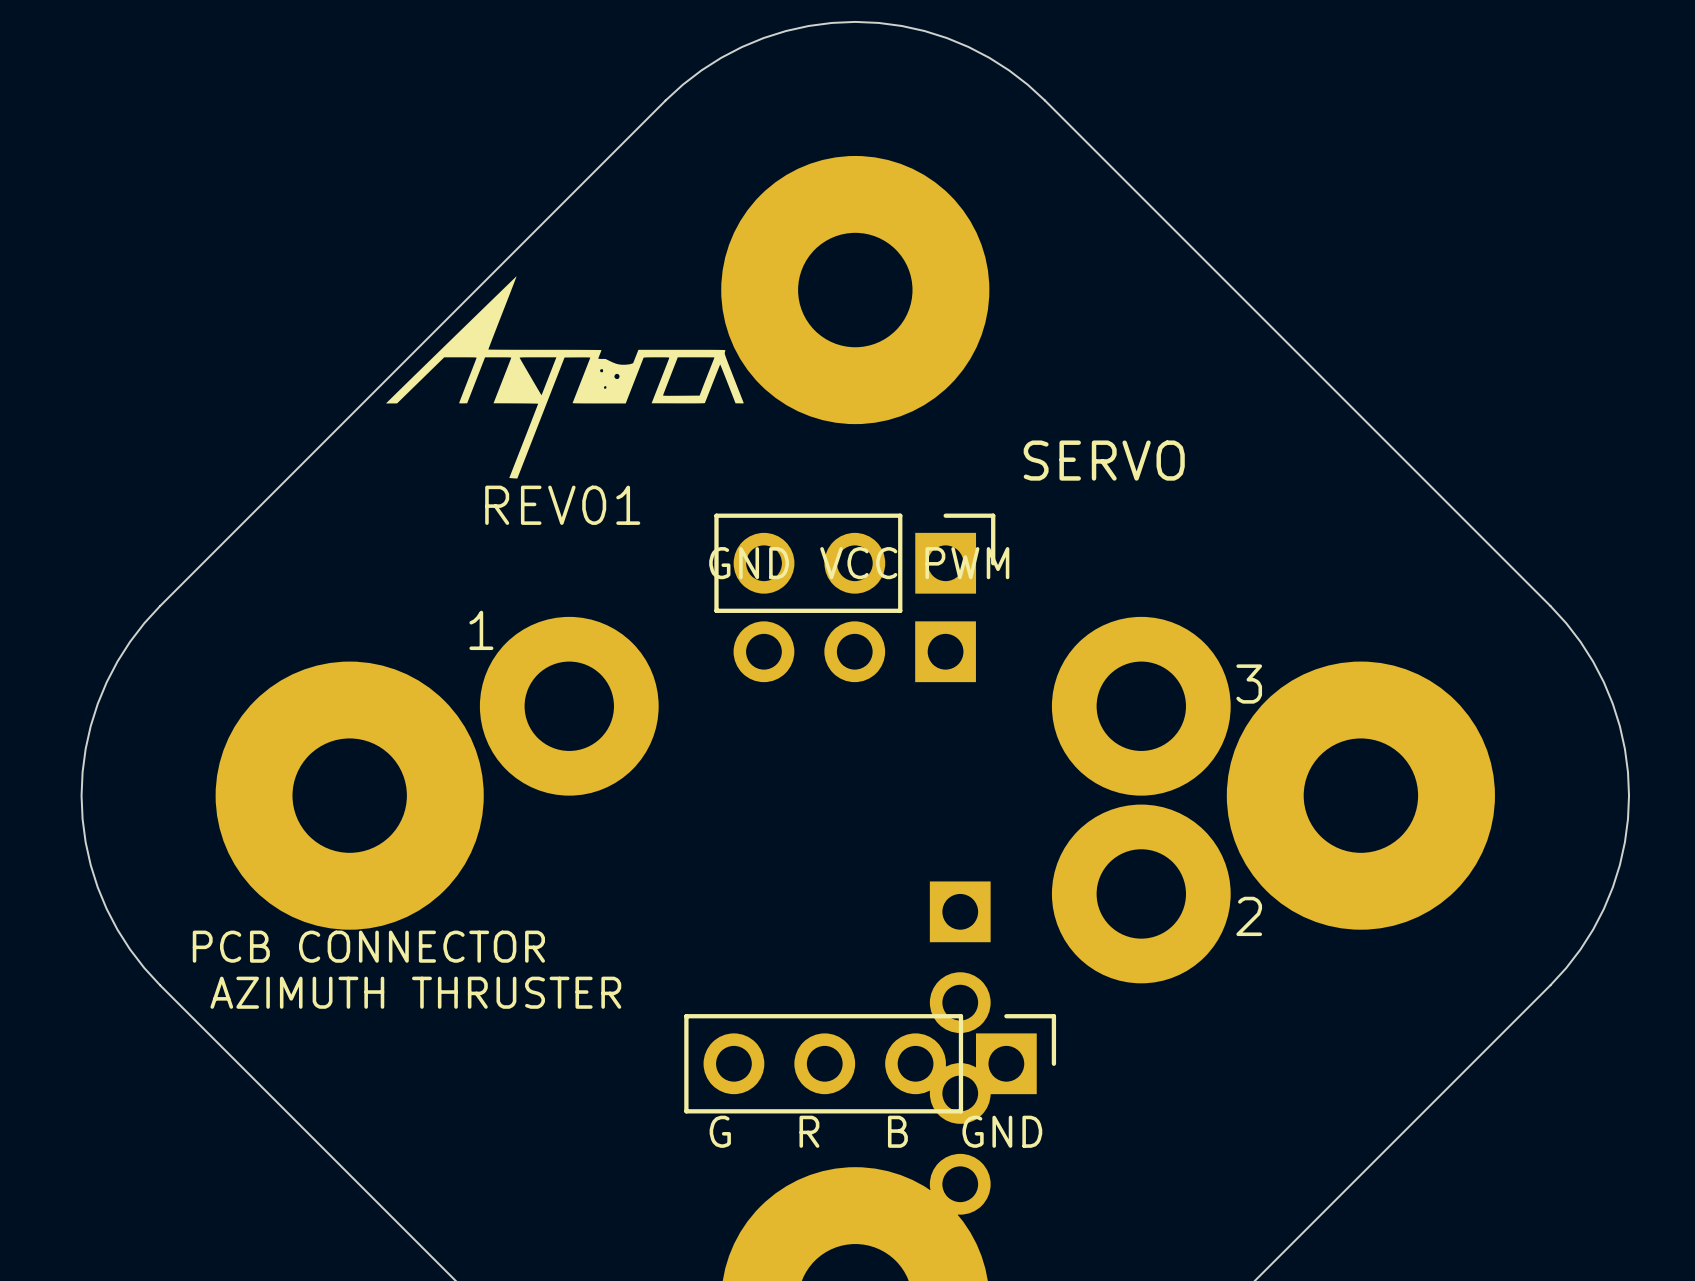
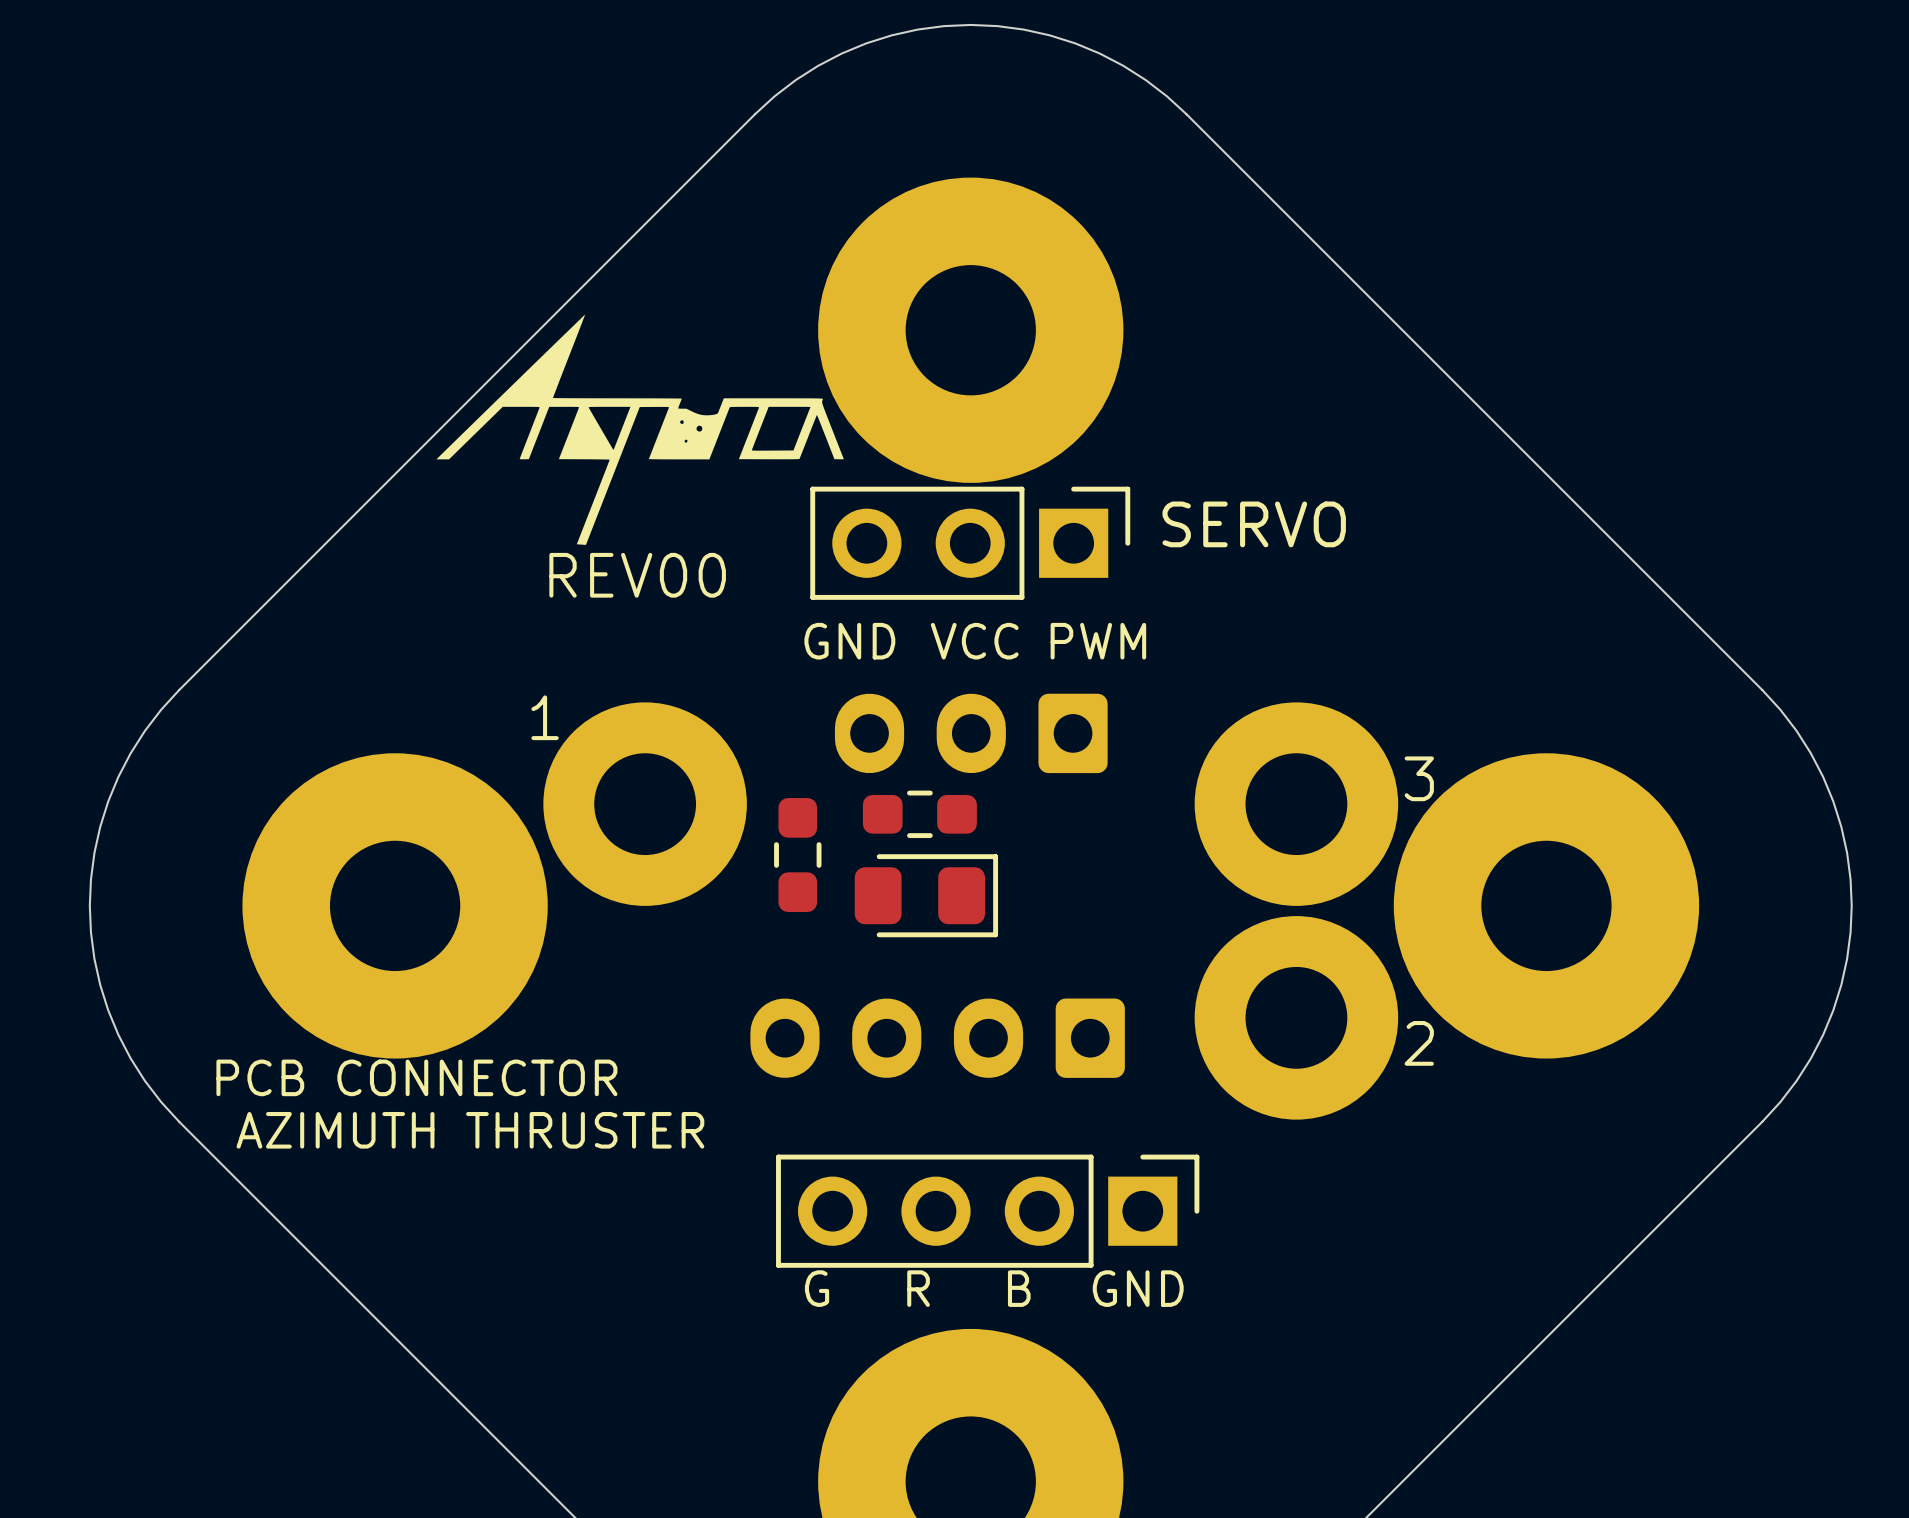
text: REV01 (562, 505) -> REV00 (637, 575)
part position: (854, 563) -> (970, 543)
part footprint: [733, 621, 976, 683] -> [834, 693, 1108, 774]
part: none -> (919, 814)
part: none -> (797, 855)
part: none -> (926, 895)
part: none -> (937, 1038)
part: (960, 1048) -> none

